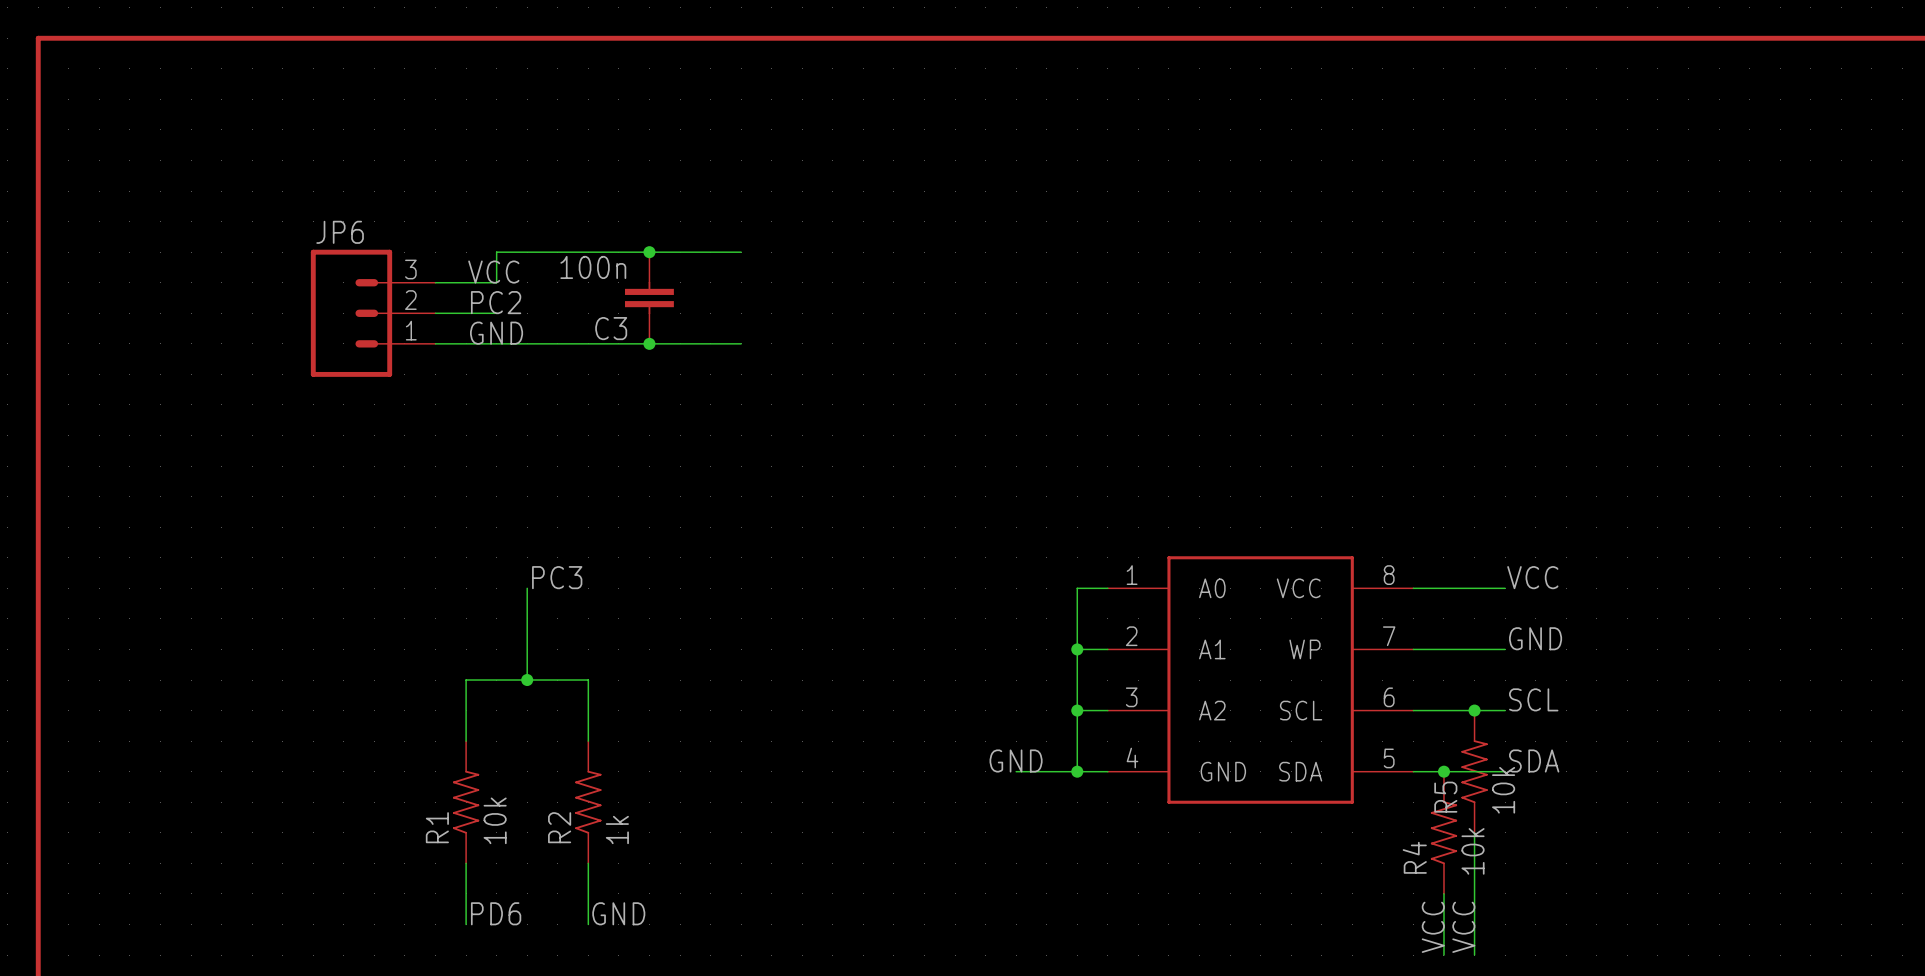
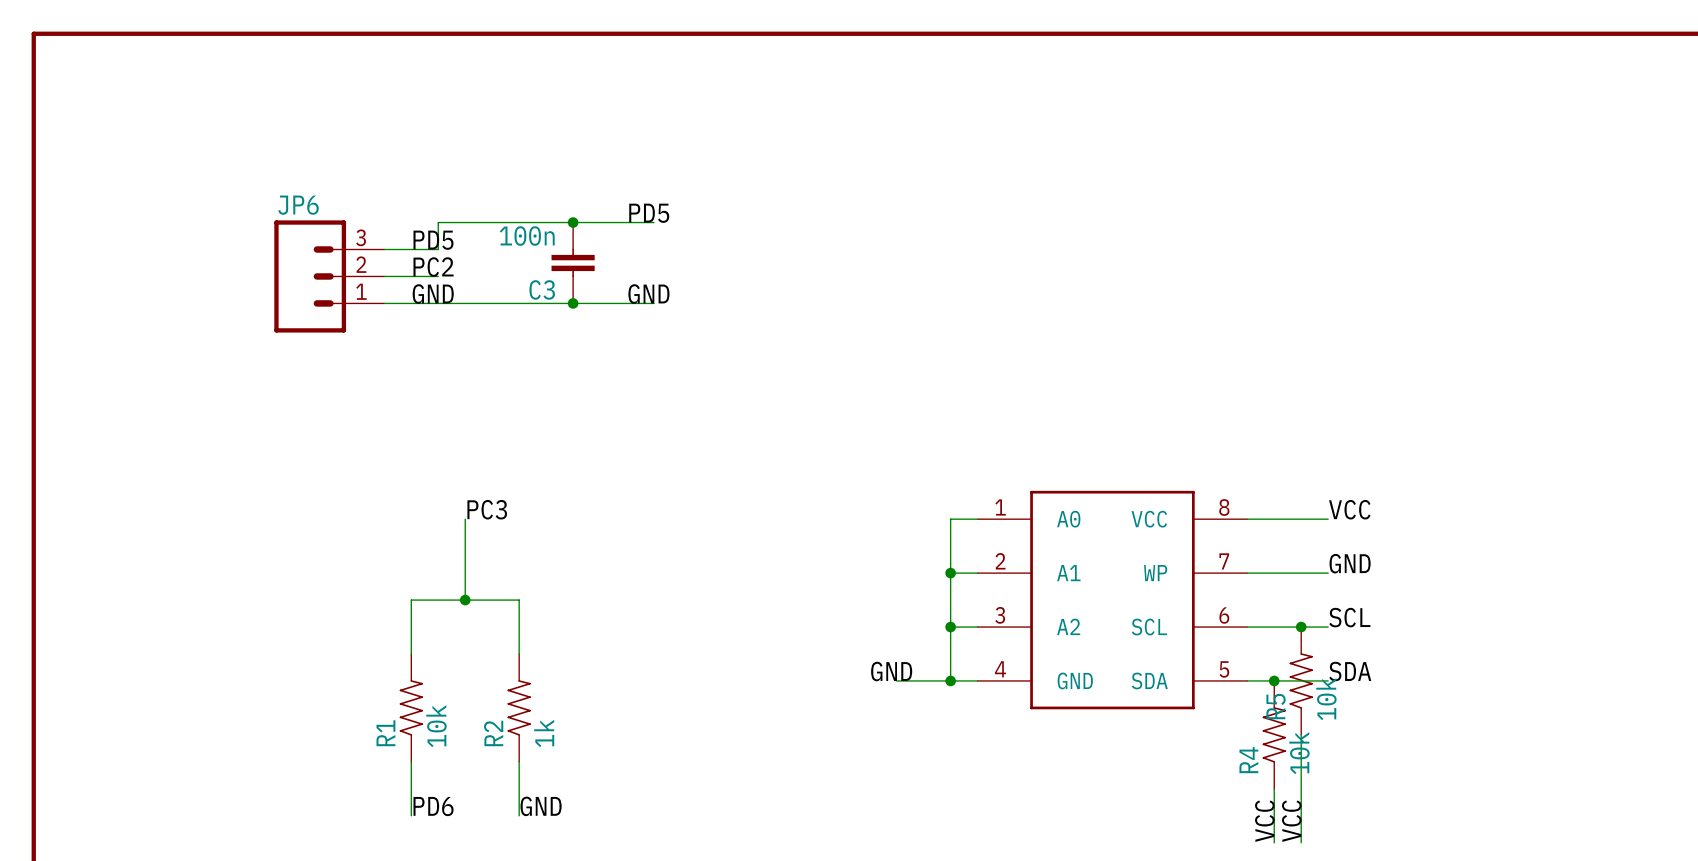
label: none -> PD5 (649, 213)
label: VCC (493, 272) -> PD5 (433, 240)
label: none -> GND (648, 293)

